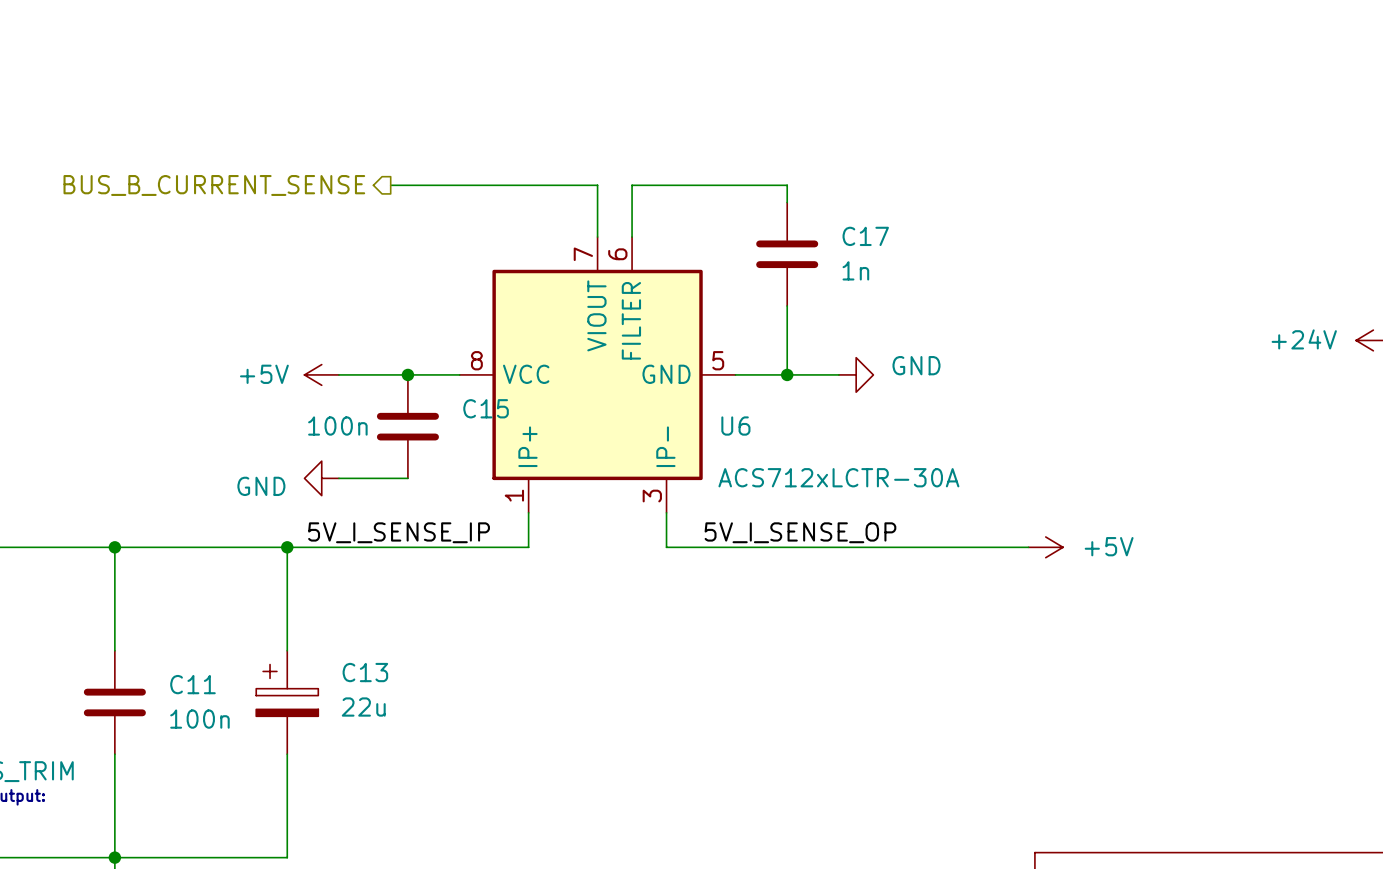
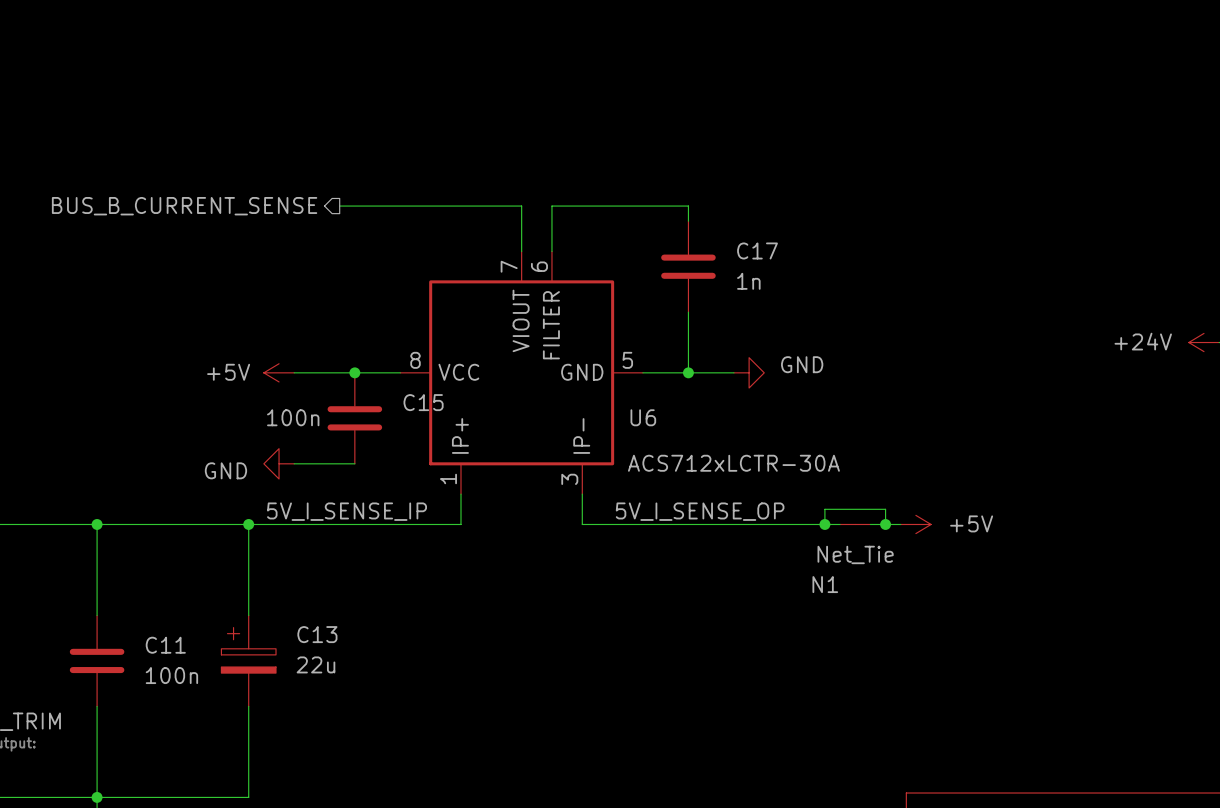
wire: none -> (824, 524) (824, 509) (885, 509) (885, 524)
junction: none -> (824, 524)
N1: none -> Net_Tie (855, 524)
junction: none -> (885, 524)

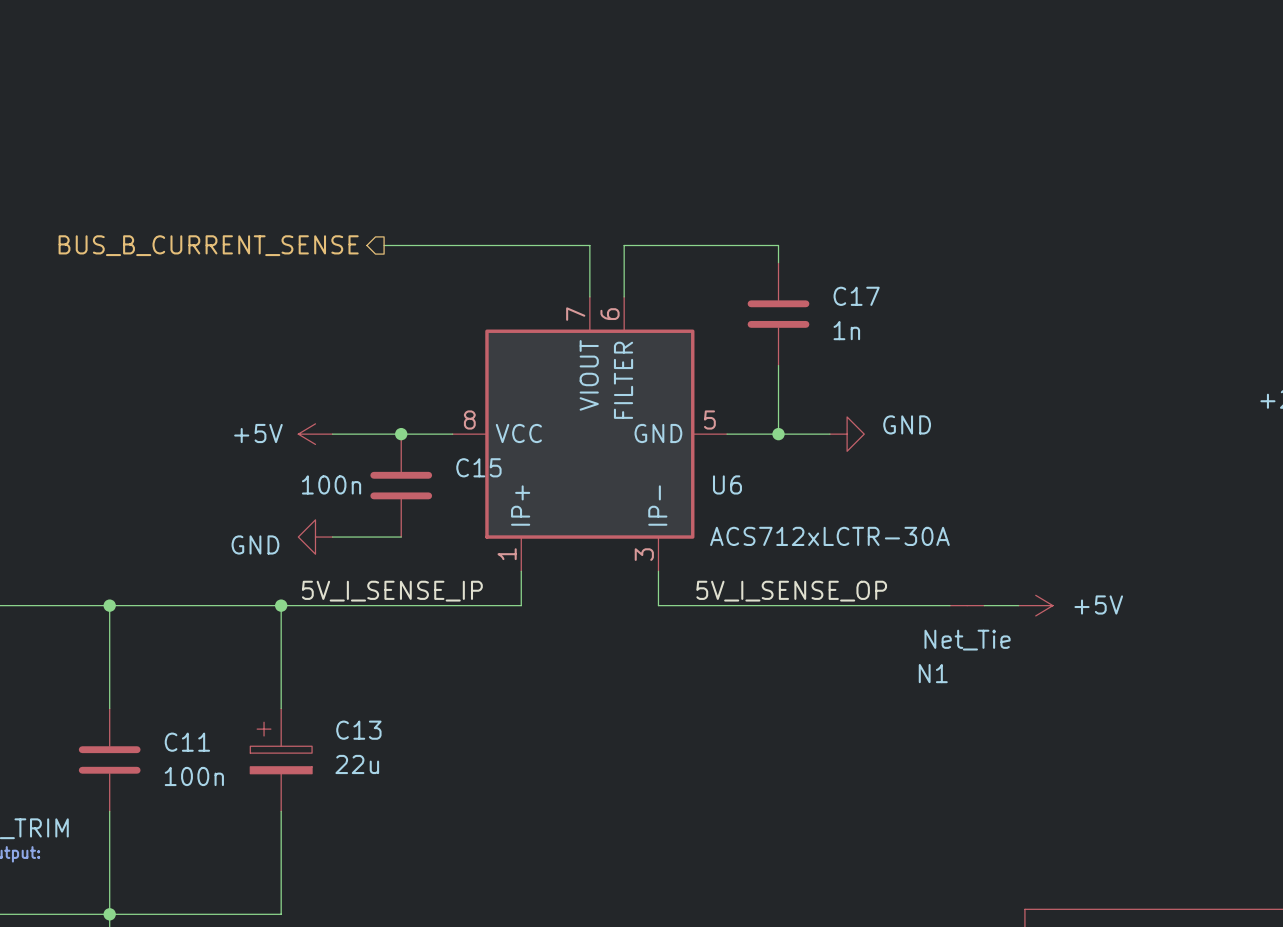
wire: (824, 524) (824, 509) (885, 509) (885, 524) -> none
junction: (824, 524) -> none
junction: (885, 524) -> none

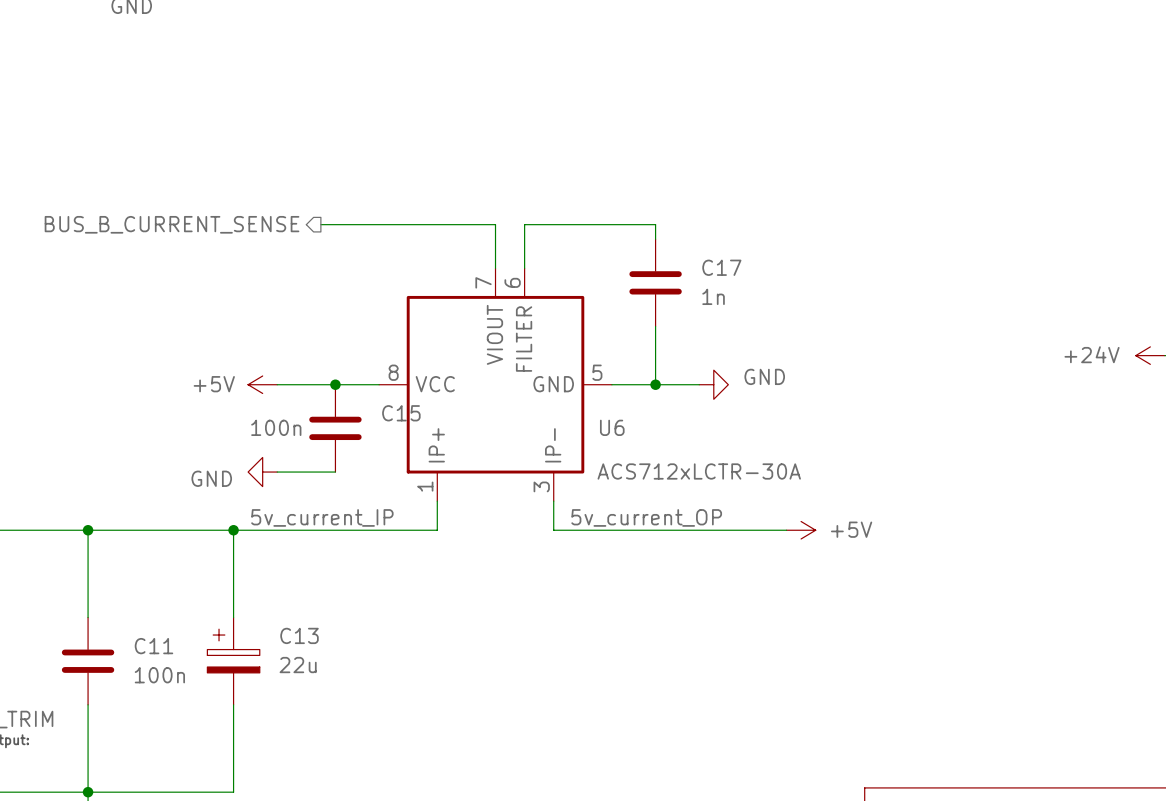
label: 5V_I_SENSE_IP (392, 591) -> 5v_current_IP (322, 517)
label: none -> 5v_current_OP (646, 517)
label: 5V_I_SENSE_OP (791, 591) -> none
power symbol text position: +5V (1098, 604) -> +5V (851, 529)
N1: Net_Tie (967, 605) -> none
wire: (984, 605) (1018, 605) -> none
power symbol position: +5V (1035, 605) -> +5V (801, 530)

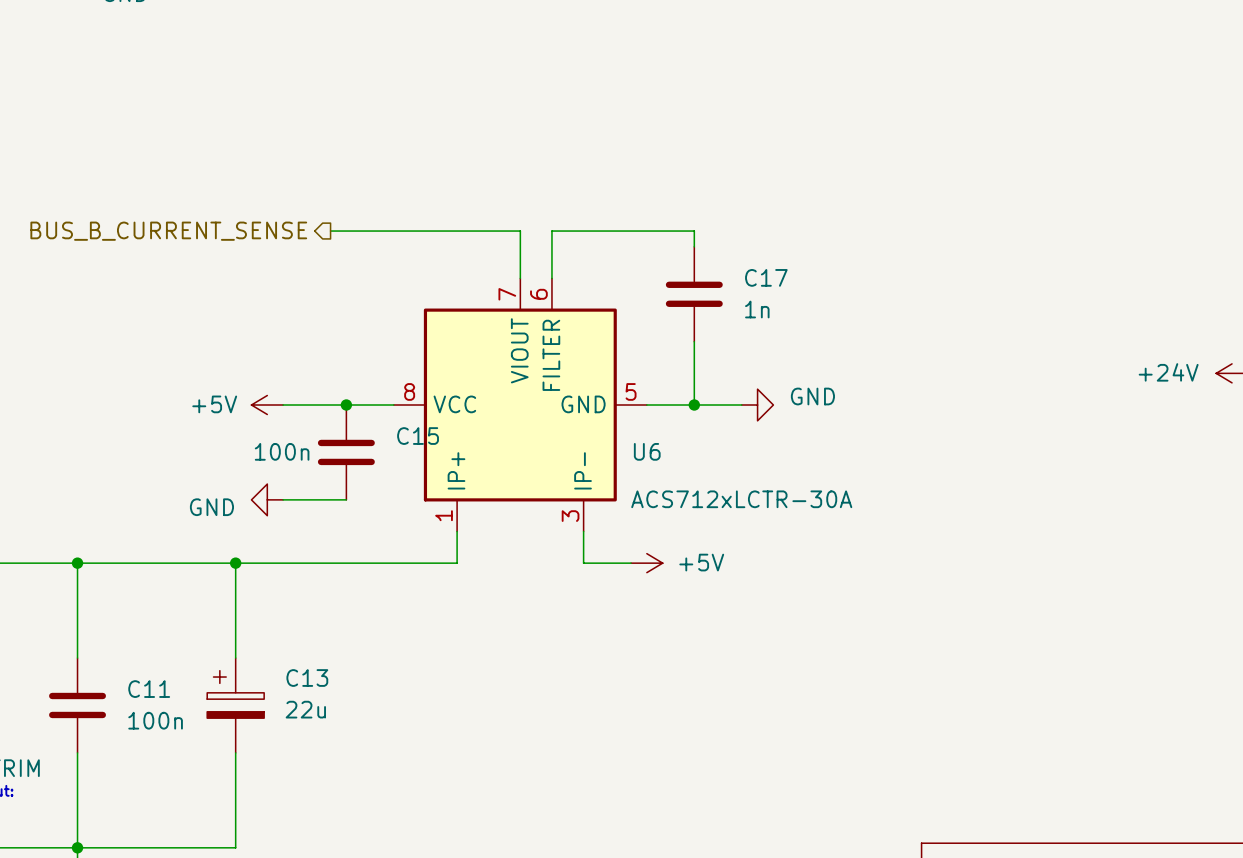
label: 5v_current_IP (322, 517) -> none
label: 5v_current_OP (646, 517) -> none
wire: (597, 530) (786, 530) -> none
power symbol position: +5V (801, 530) -> +5V (646, 563)

